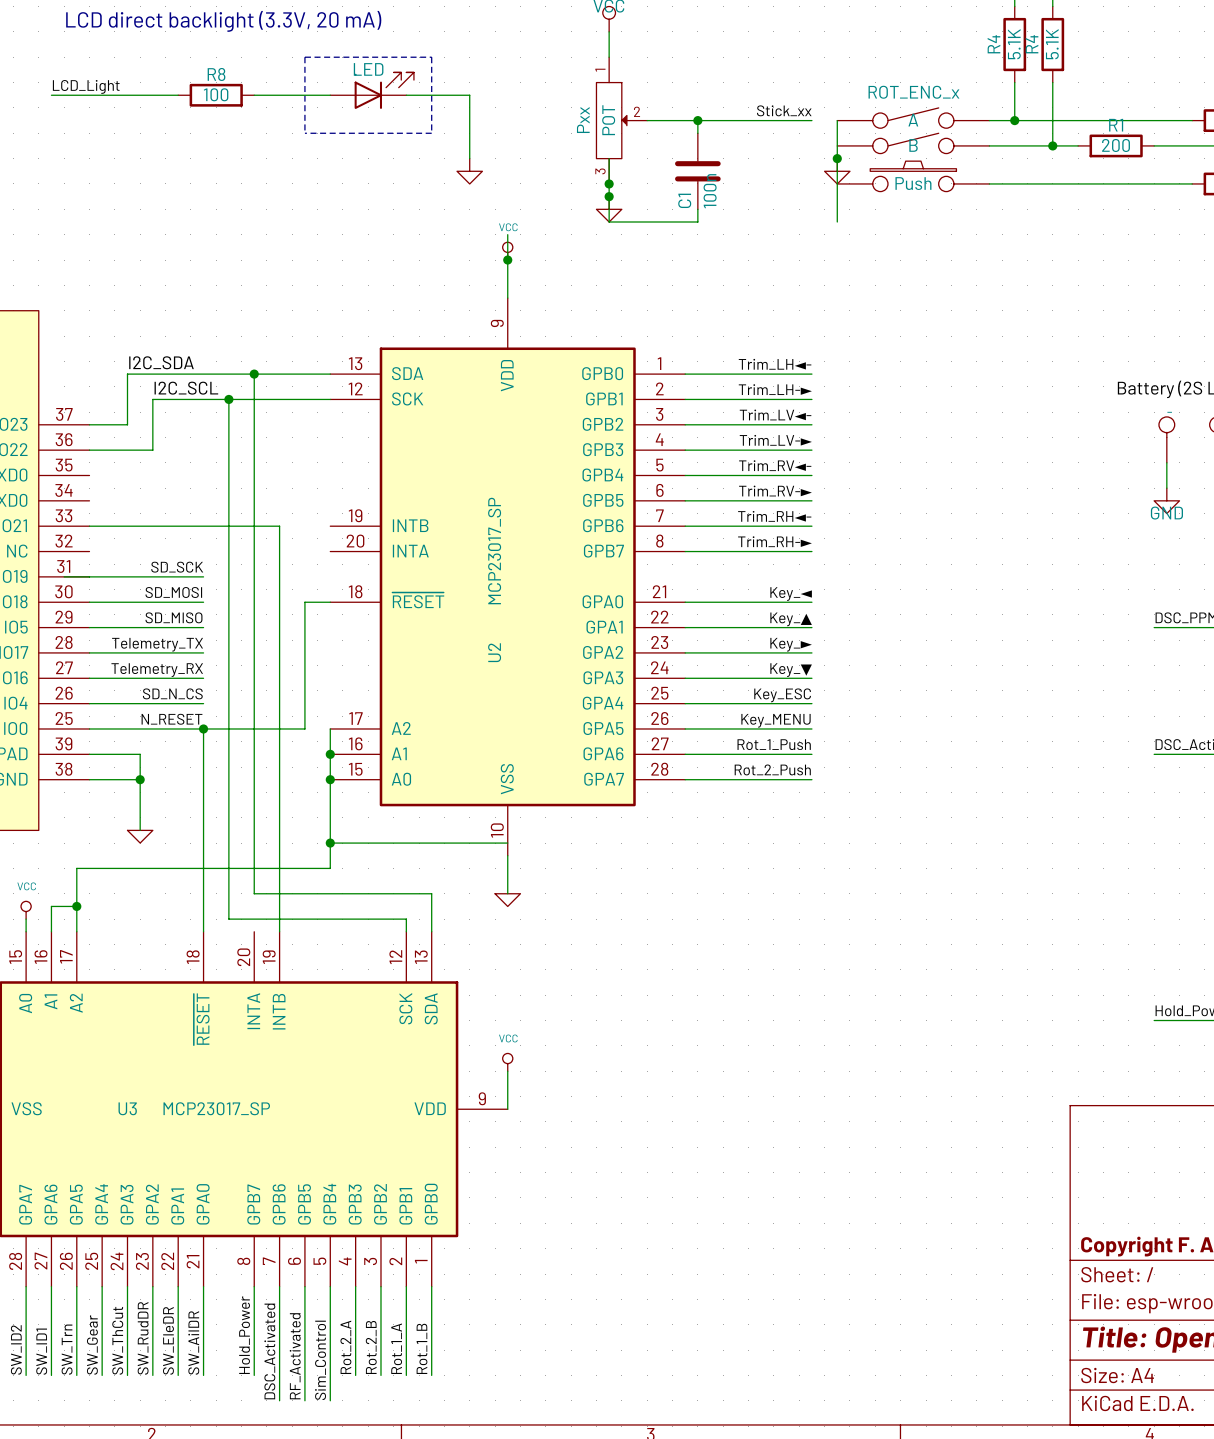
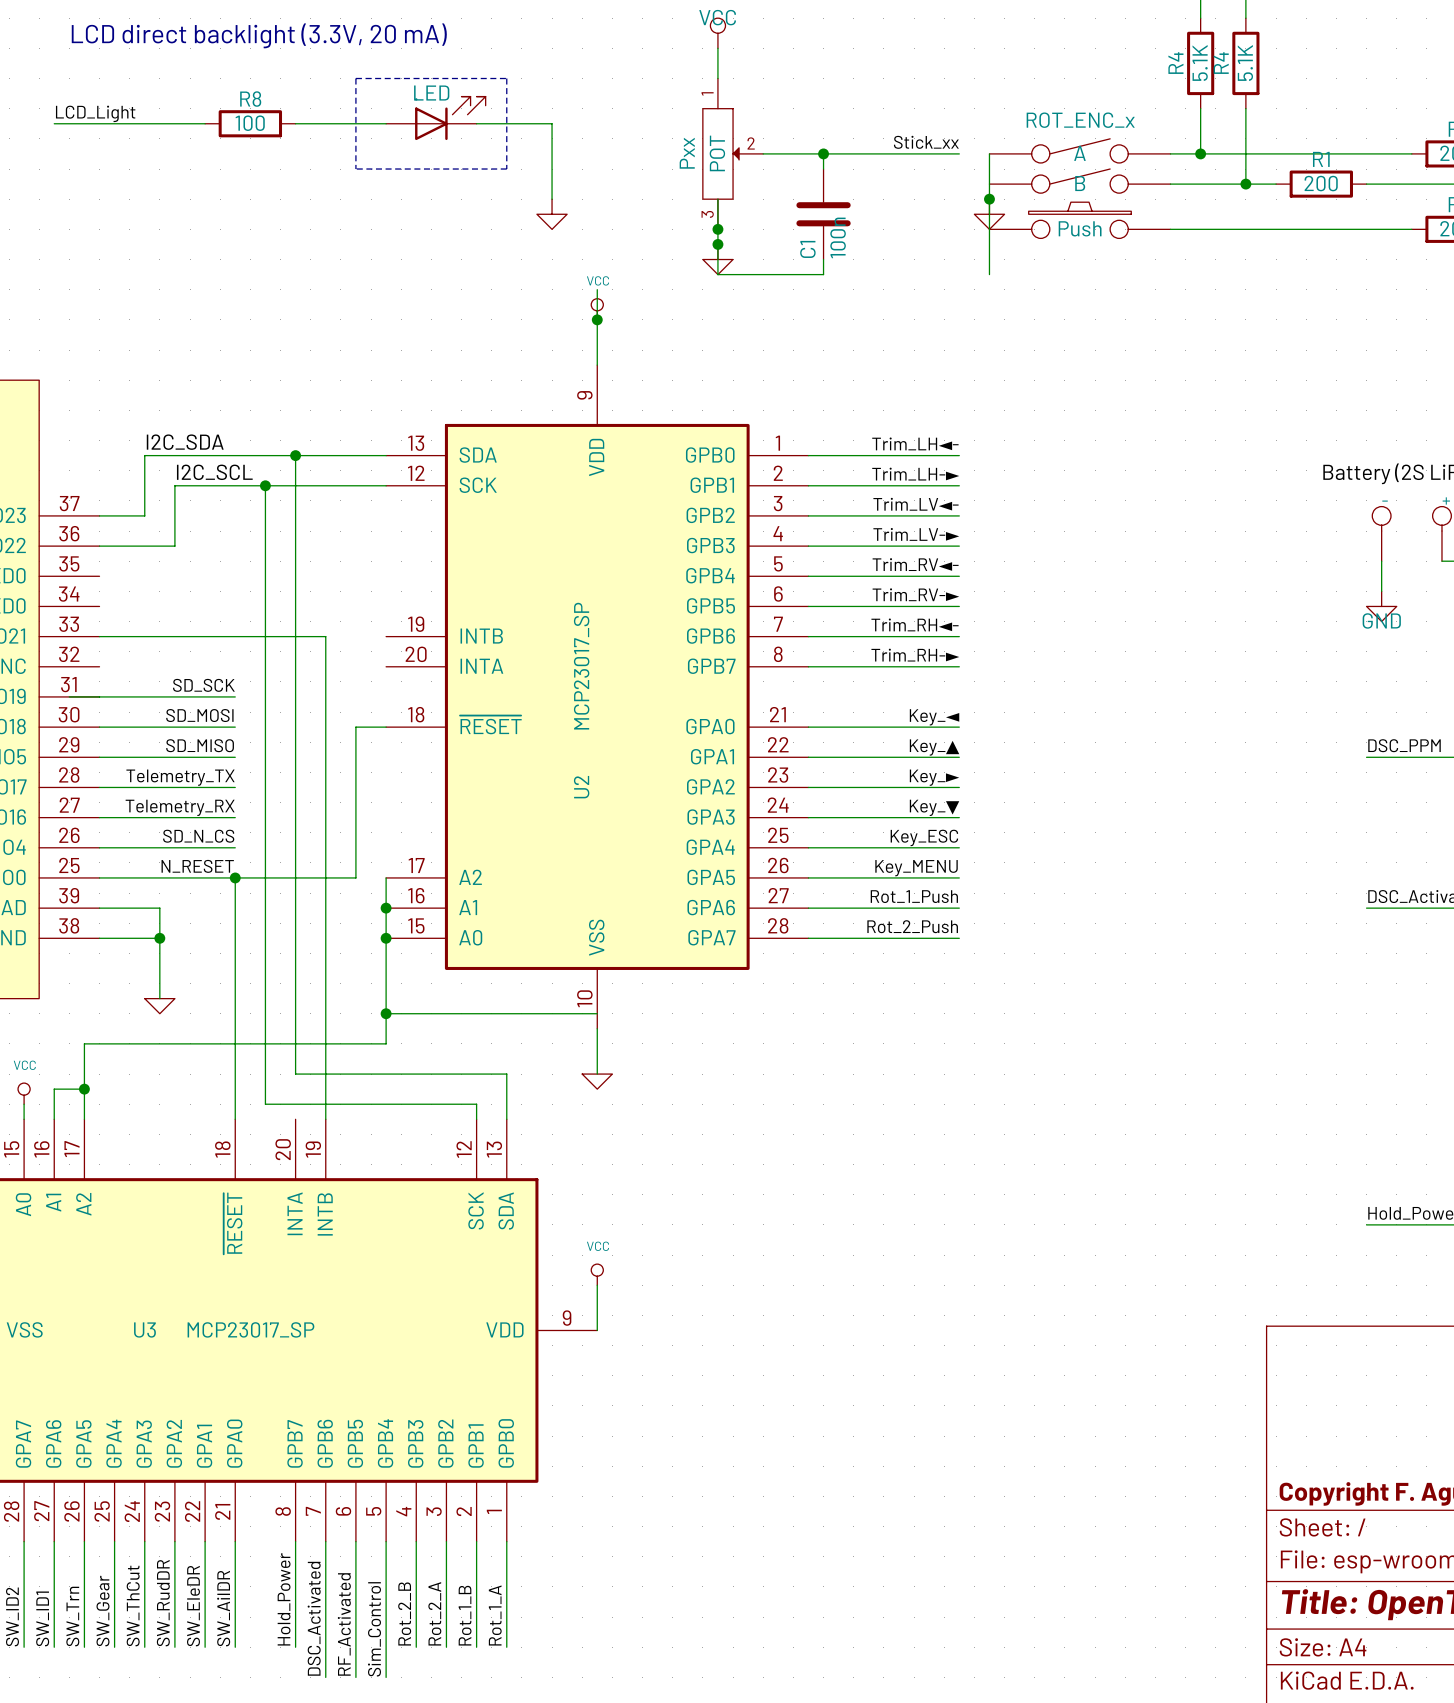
label: Rot_2_A (345, 1347) -> Rot_2_B (404, 1614)
label: Rot_2_B (371, 1347) -> Rot_2_A (434, 1613)
label: Rot_1_A (396, 1348) -> Rot_1_B (465, 1615)
label: Rot_1_B (422, 1348) -> Rot_1_A (495, 1615)

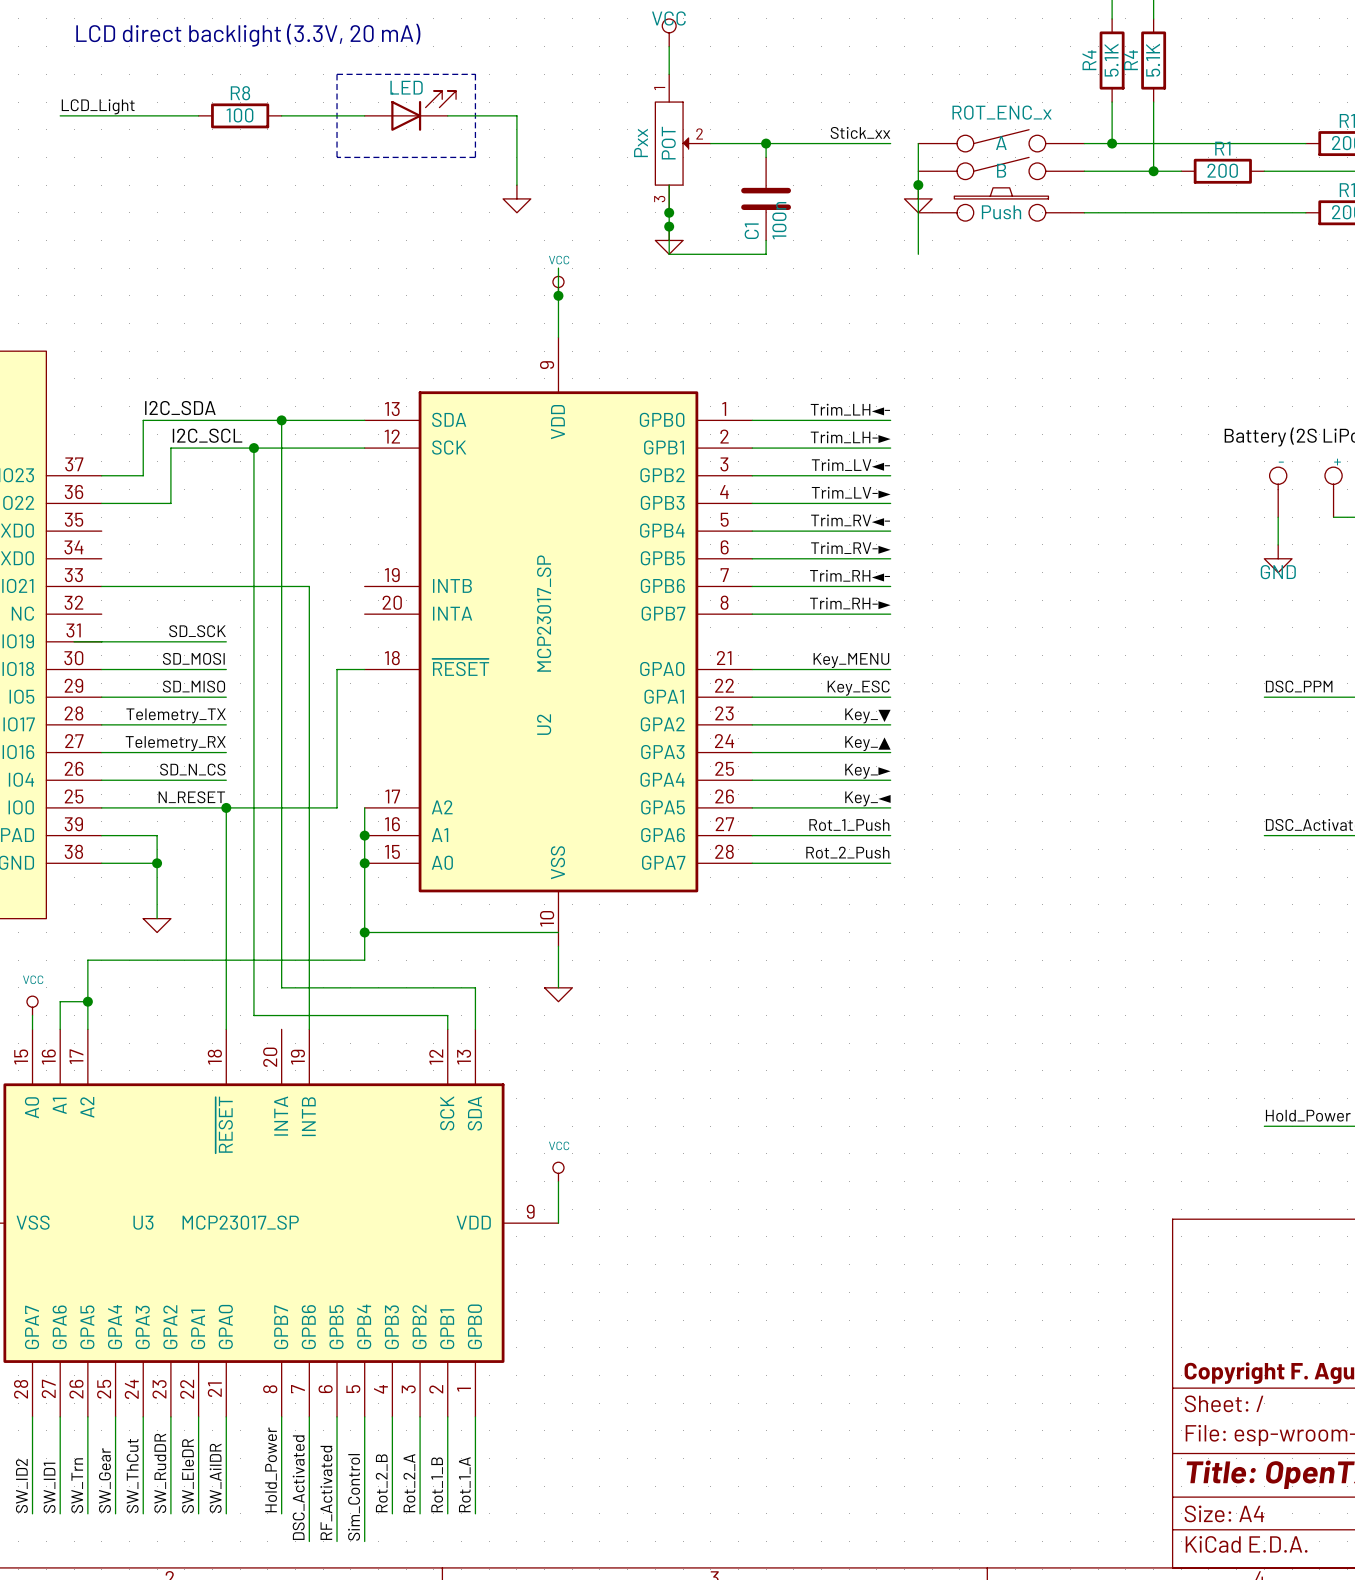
label: Key_◄ (934, 717) -> Key_MENU (851, 660)
label: Key_▲ (934, 747) -> Key_ESC (858, 688)
label: Key_► (934, 777) -> Key_▼ (867, 715)
label: Key_▼ (934, 807) -> Key_▲ (867, 743)
label: Key_ESC (924, 837) -> Key_► (867, 771)
label: Key_MENU (916, 868) -> Key_◄ (867, 798)

